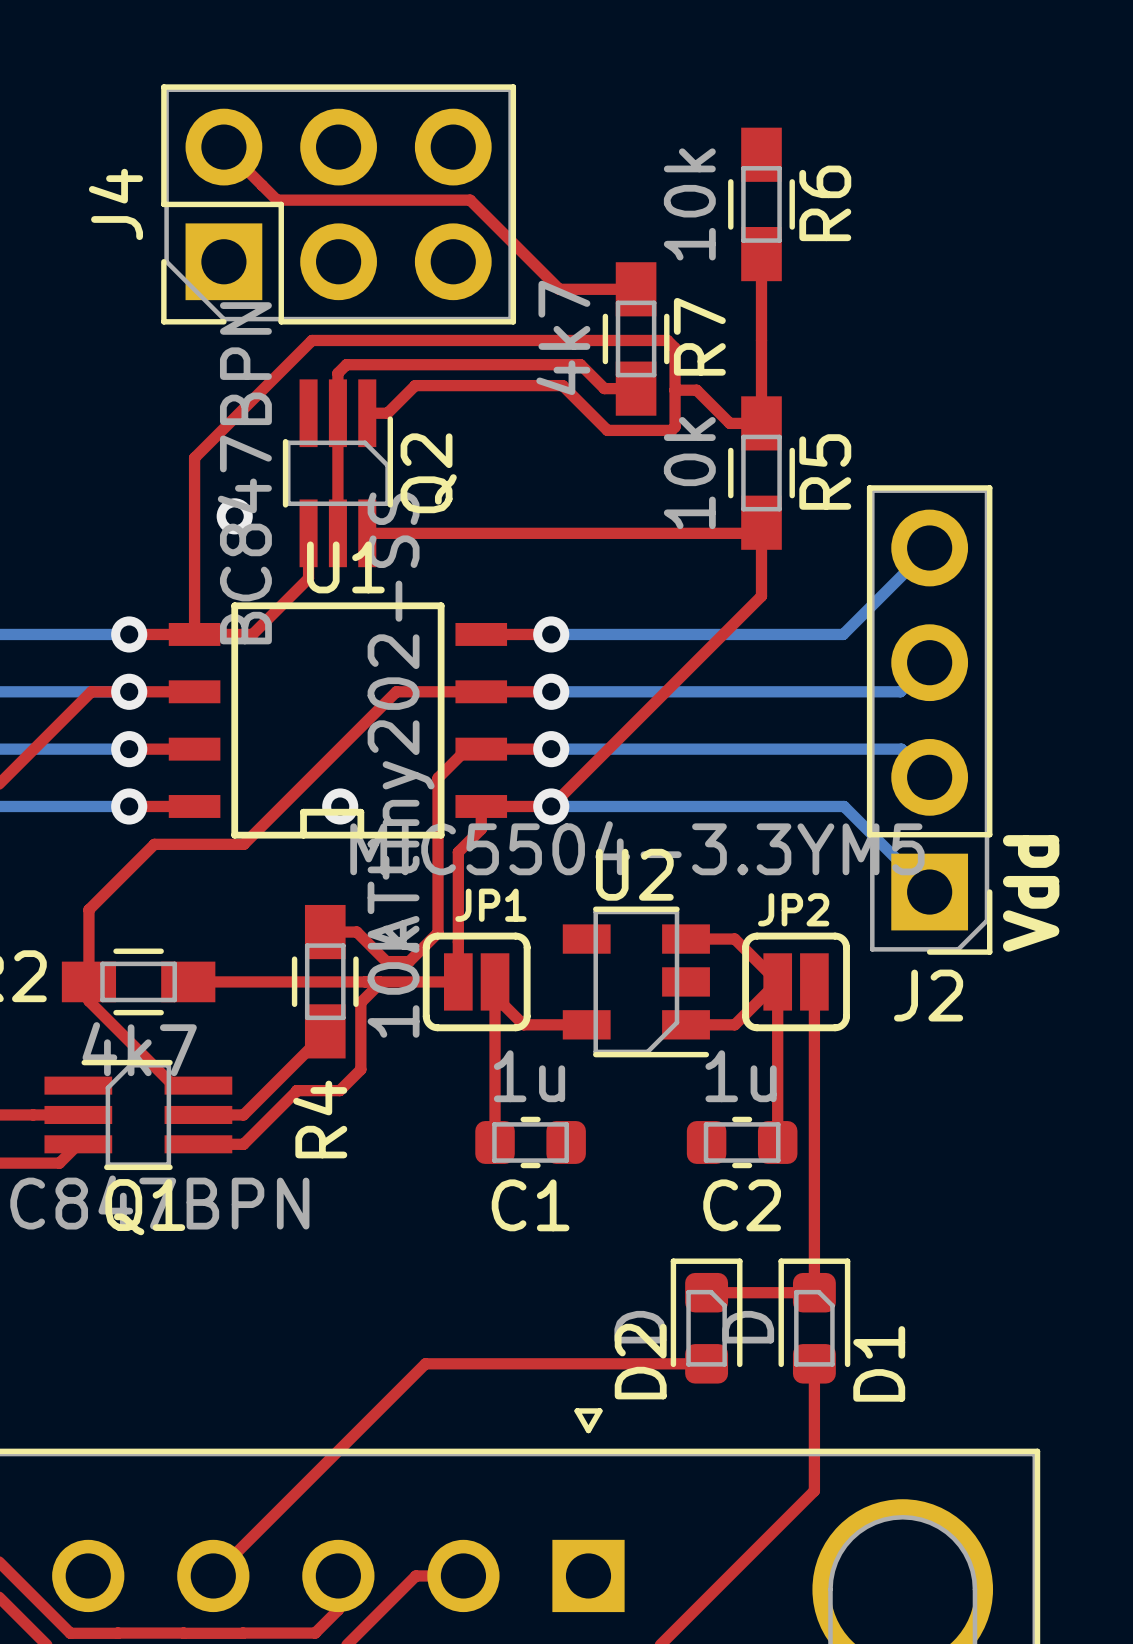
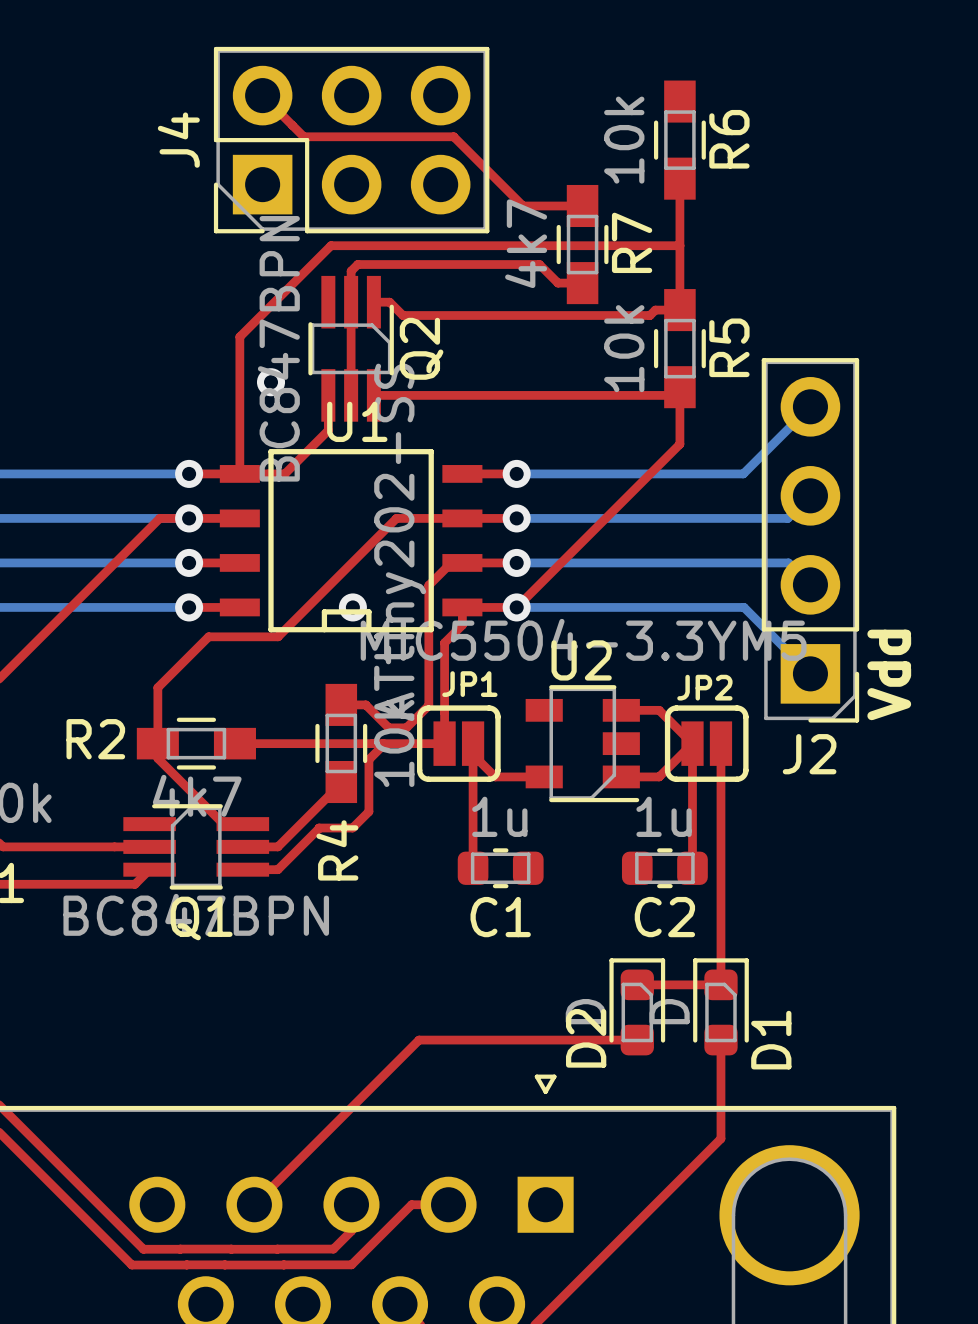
top track: (667, 340) (675, 348) (675, 426) (671, 430) -> (606, 245) (679, 245)
top track: (675, 390) (696, 390) (729, 423) -> (610, 315) (649, 315) (655, 310)
top track: (387, 413) (415, 385) (562, 385) (607, 430) -> (389, 302) (402, 315) (560, 315)

